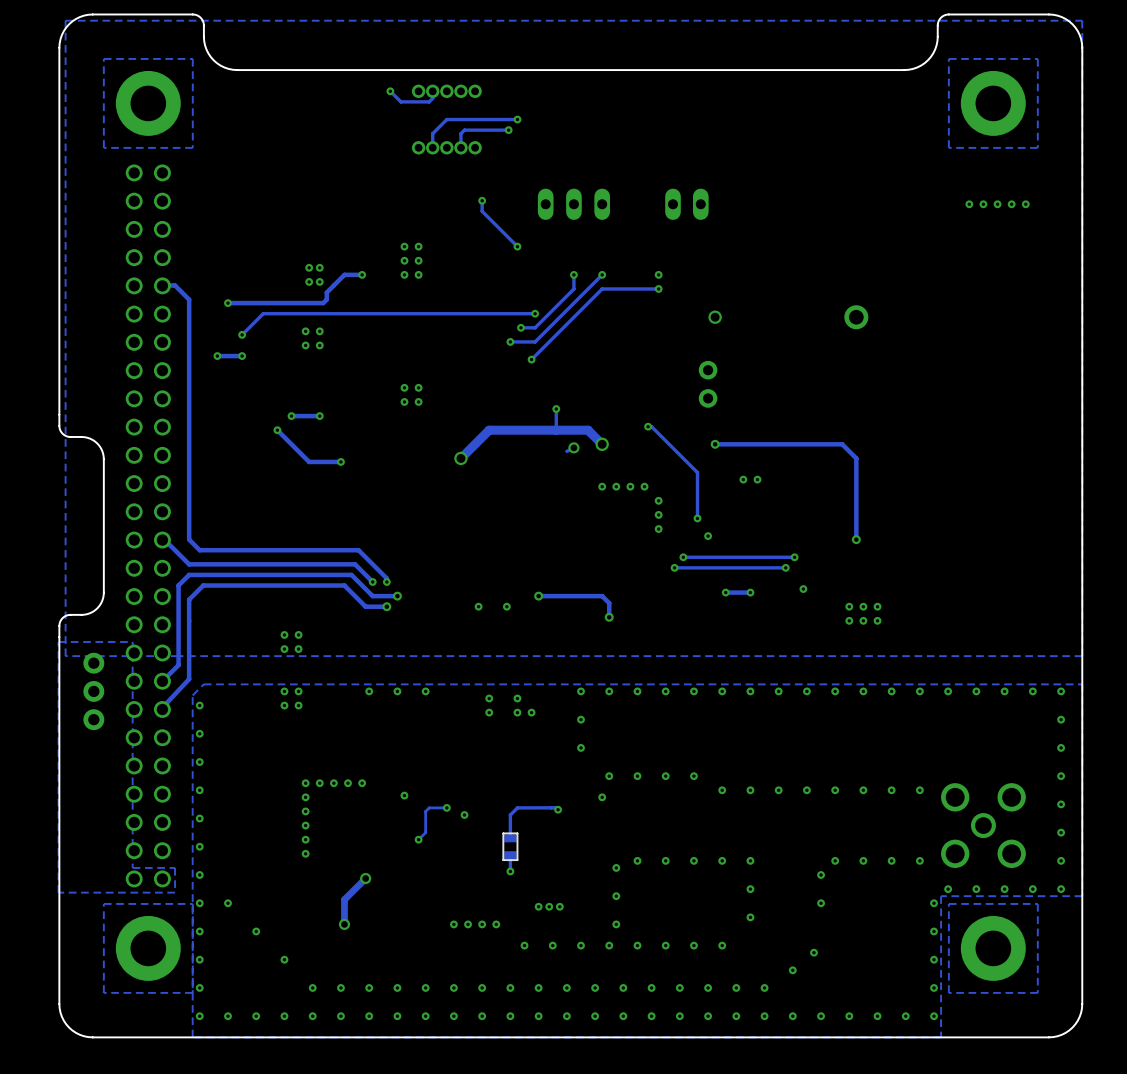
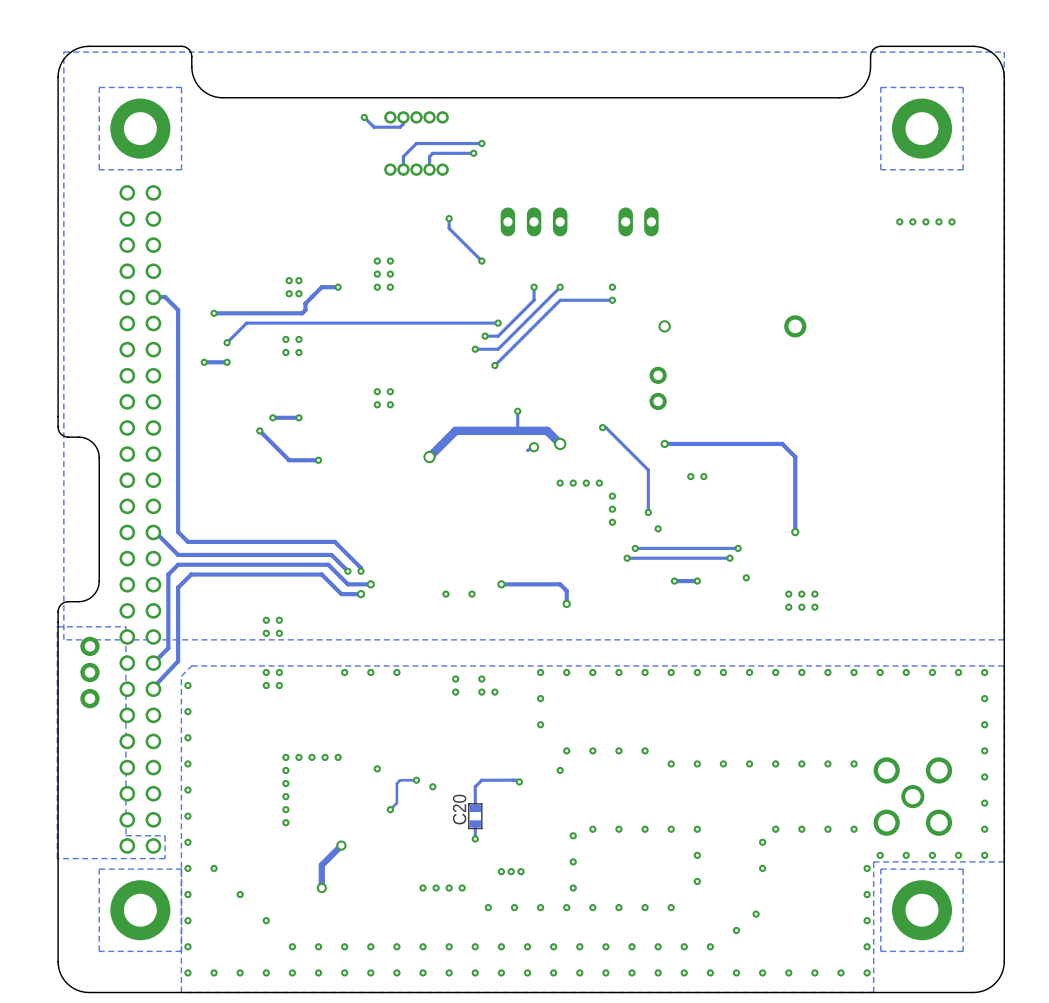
C20 name: none -> C20 (459, 809)

